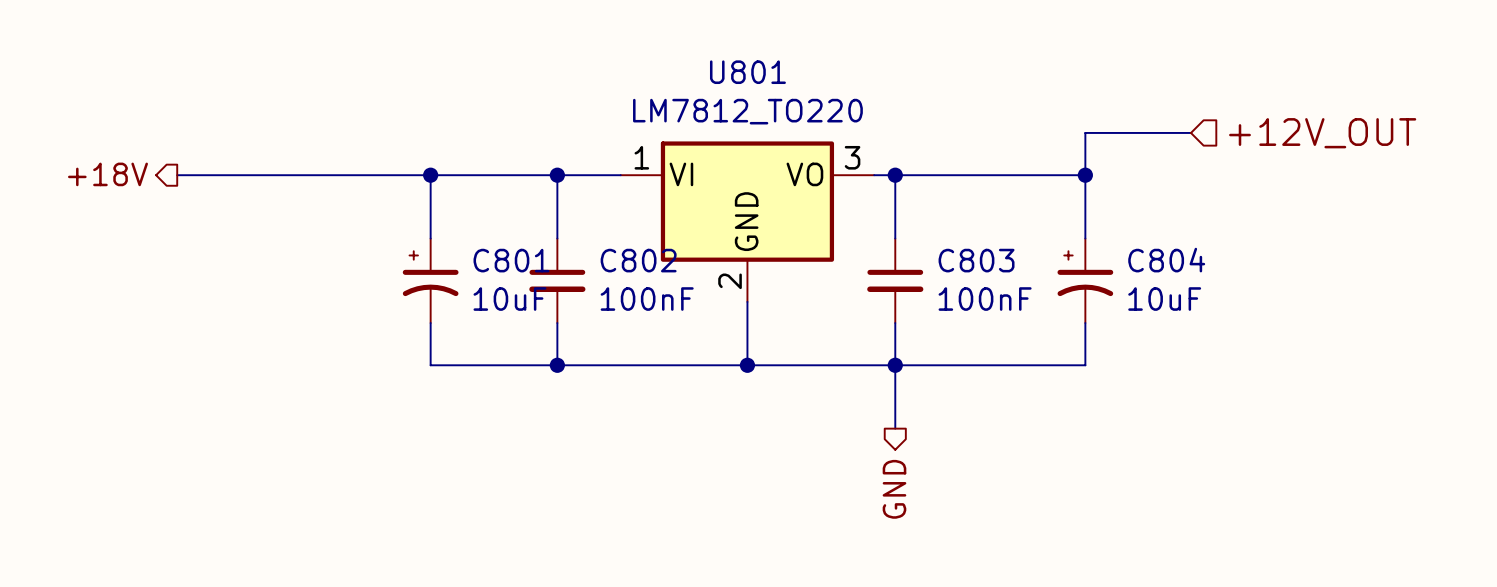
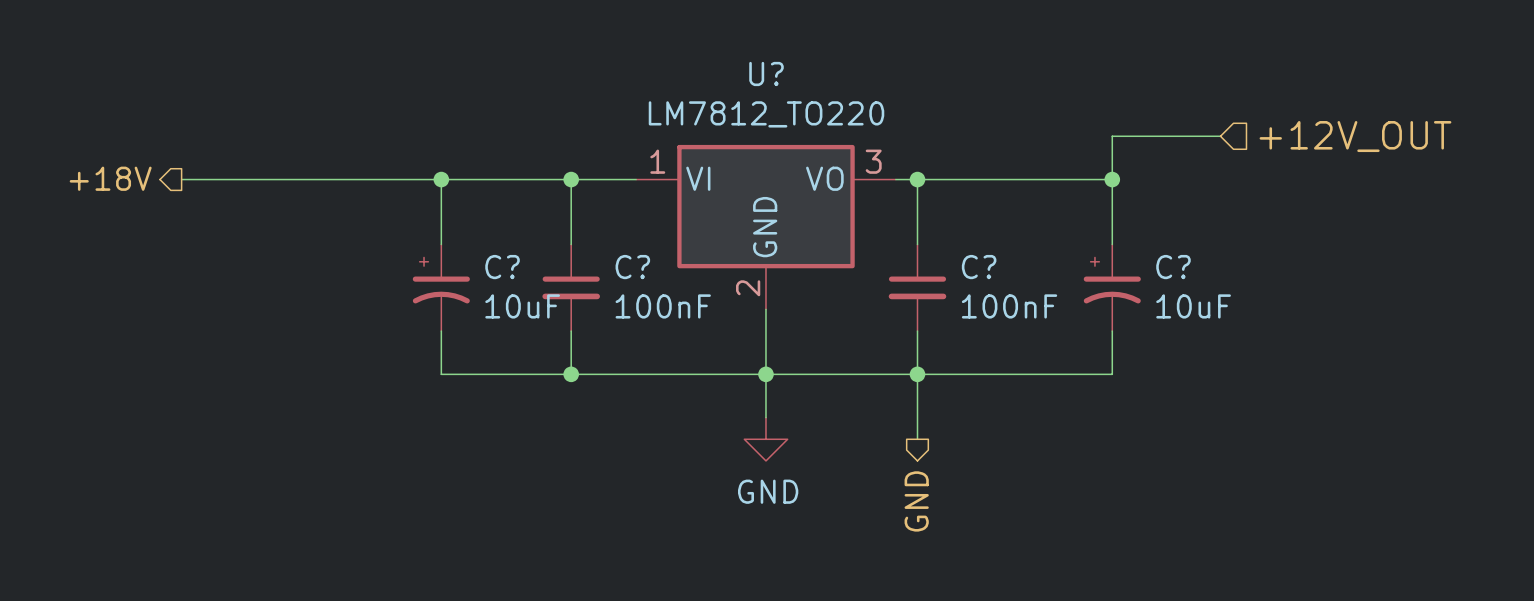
U801 name: U801 (747, 72) -> U? (766, 73)
C801 name: C801 (511, 260) -> C? (502, 267)
C802 name: C802 (638, 260) -> C? (632, 267)
C803 name: C803 (976, 260) -> C? (979, 267)
C804 name: C804 (1166, 260) -> C? (1173, 267)
wire: none -> (765, 374) (765, 417)
power symbol: none -> GND (765, 439)

